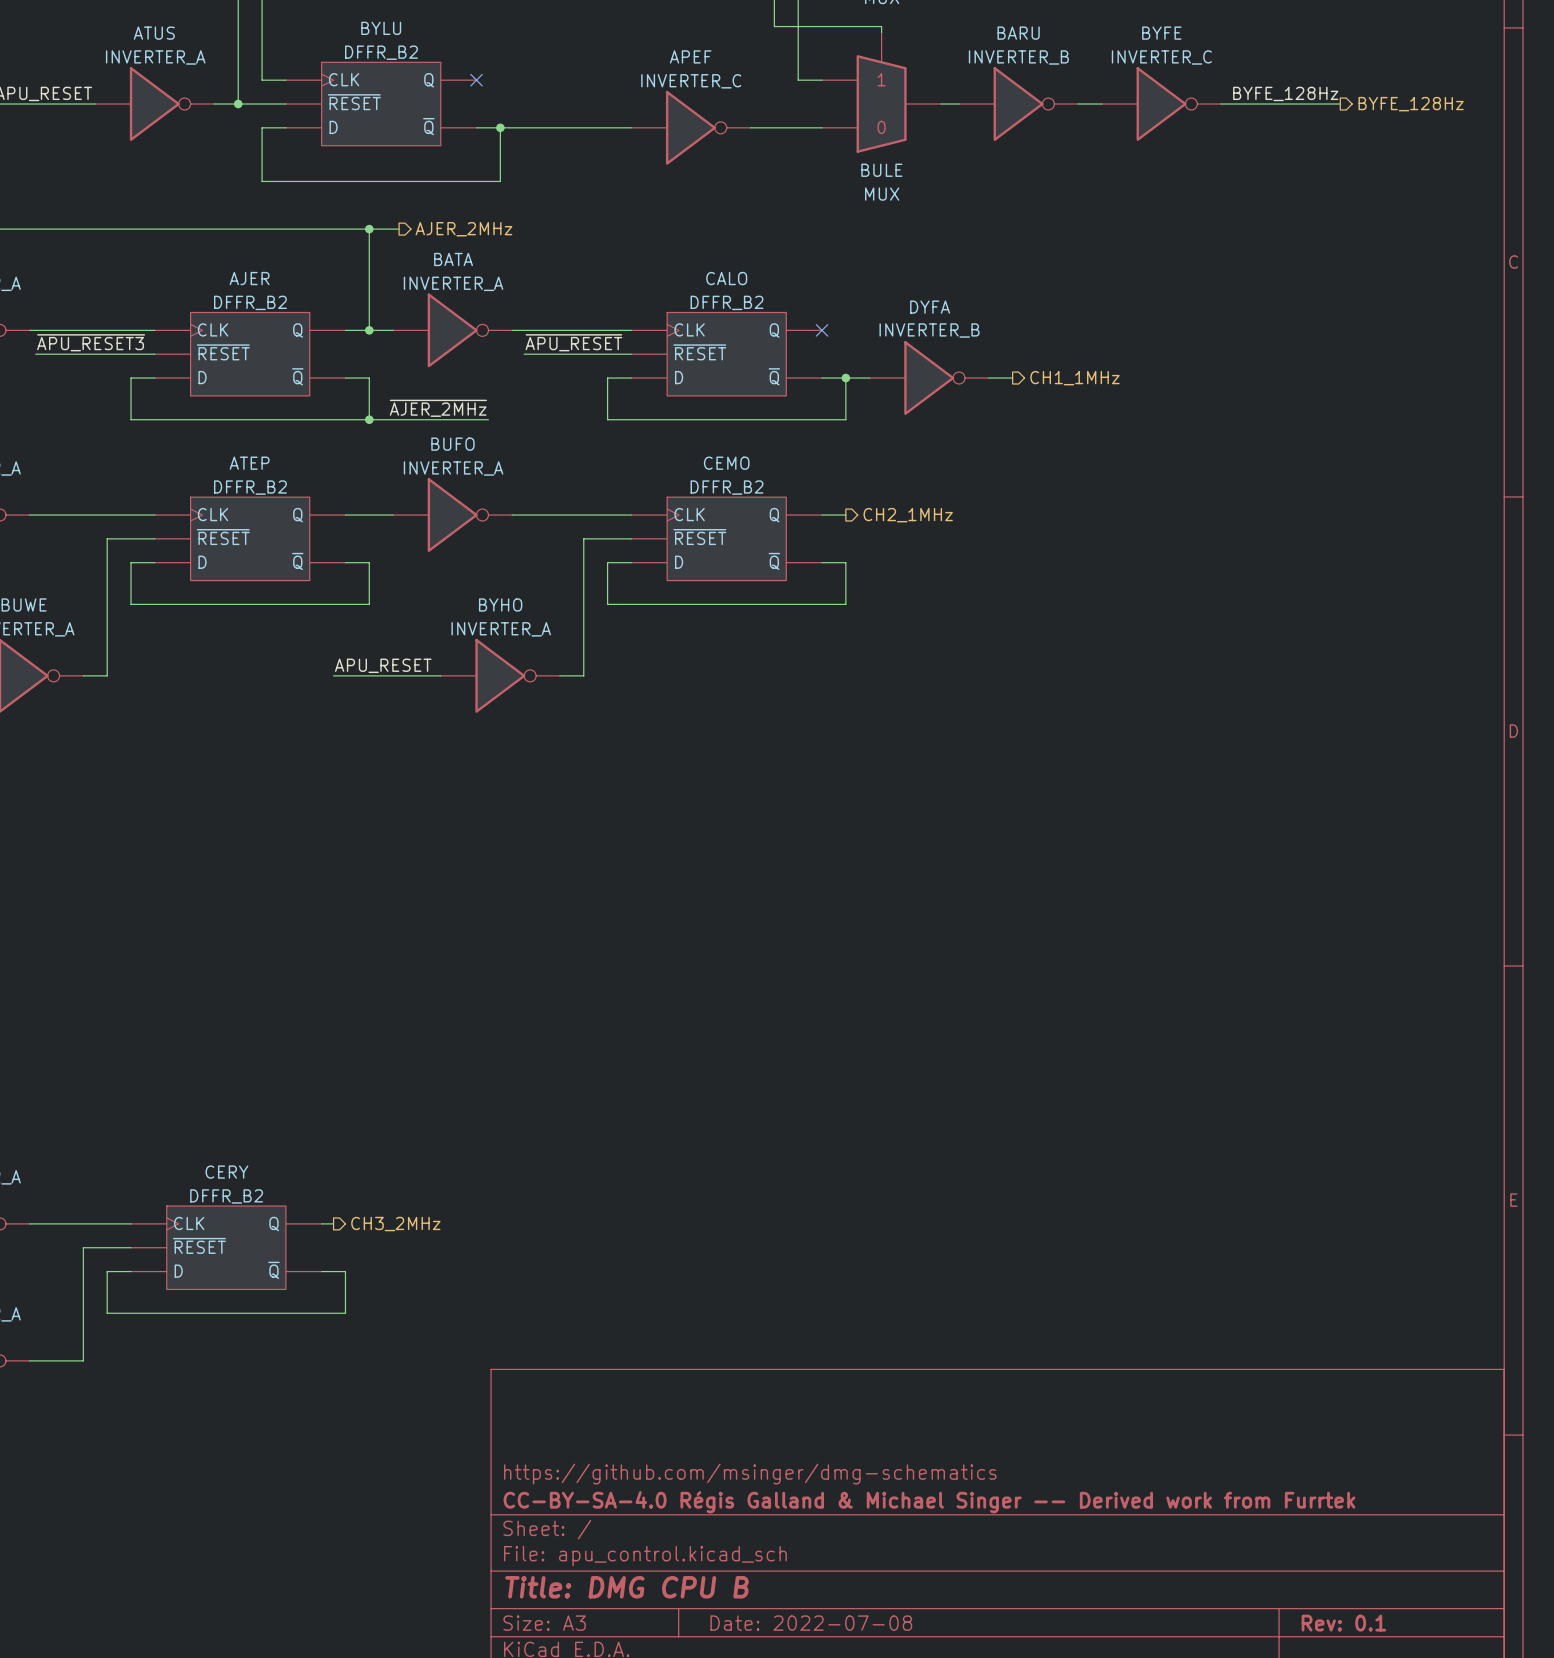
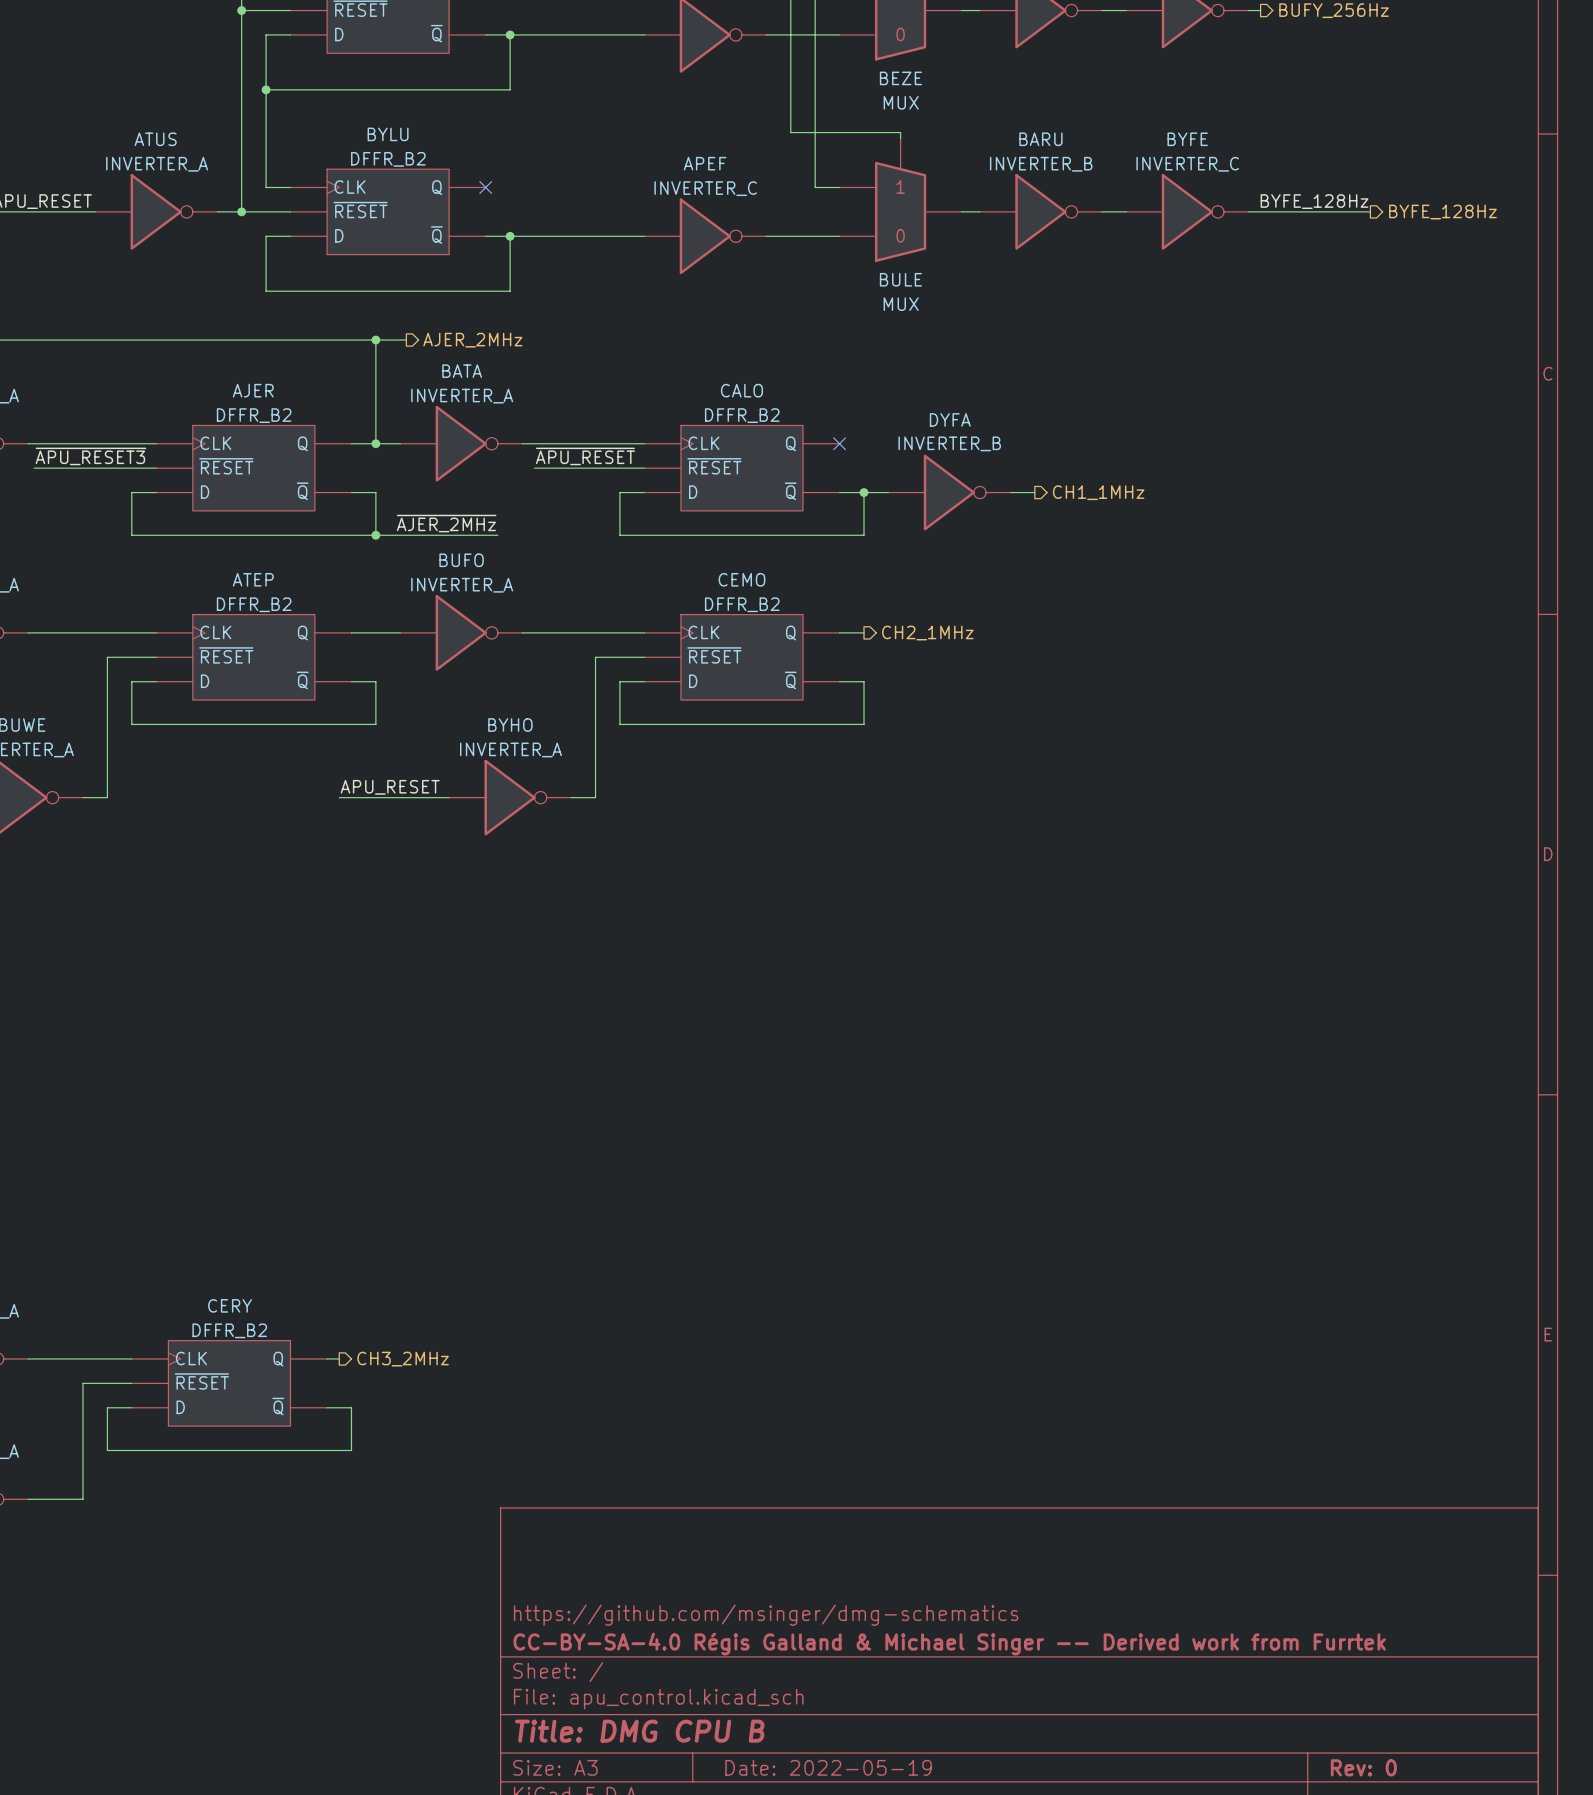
title block: Date: 2022-07-08 (811, 1623) -> Date: 2022-05-19 (828, 1767)
title block: Rev: 0.1 (1343, 1623) -> Rev: 0 (1363, 1767)

